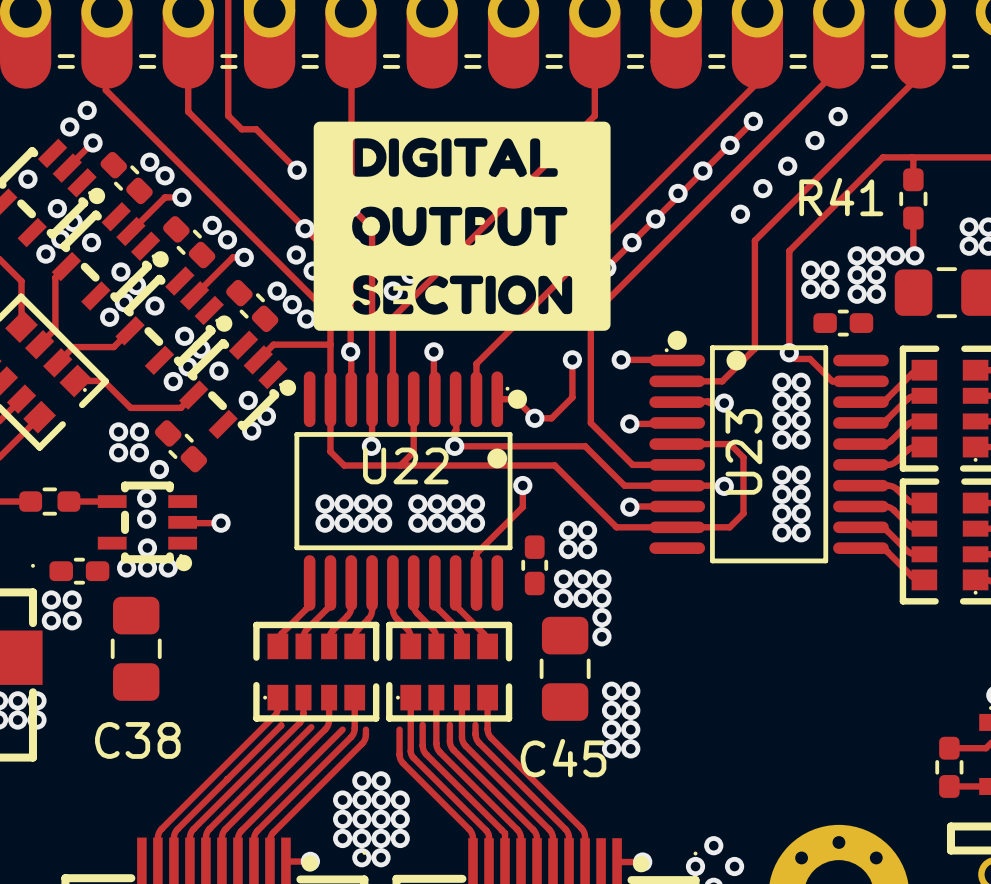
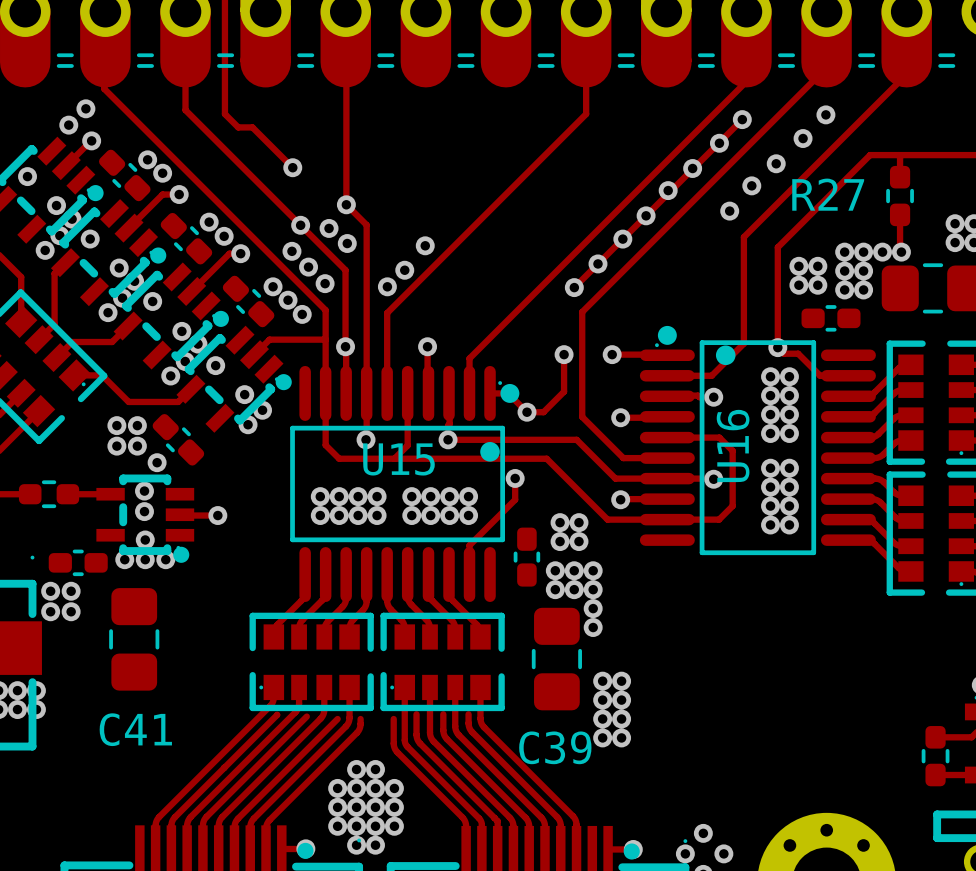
drawing: [313, 121, 611, 331] -> none
R41 name: R41 (841, 197) -> R27 (828, 194)
U23 name: U23 (743, 451) -> U16 (733, 445)
U22 name: U22 (405, 465) -> U15 (398, 459)
C38 name: C38 (137, 740) -> C41 (135, 729)
C45 name: C45 (563, 758) -> C39 (555, 747)

